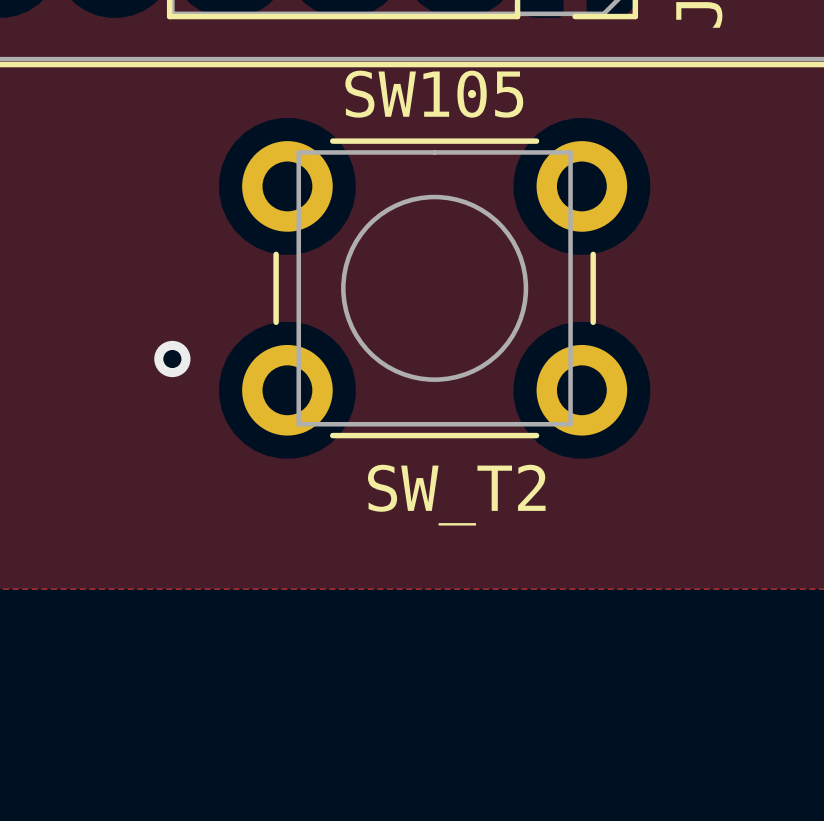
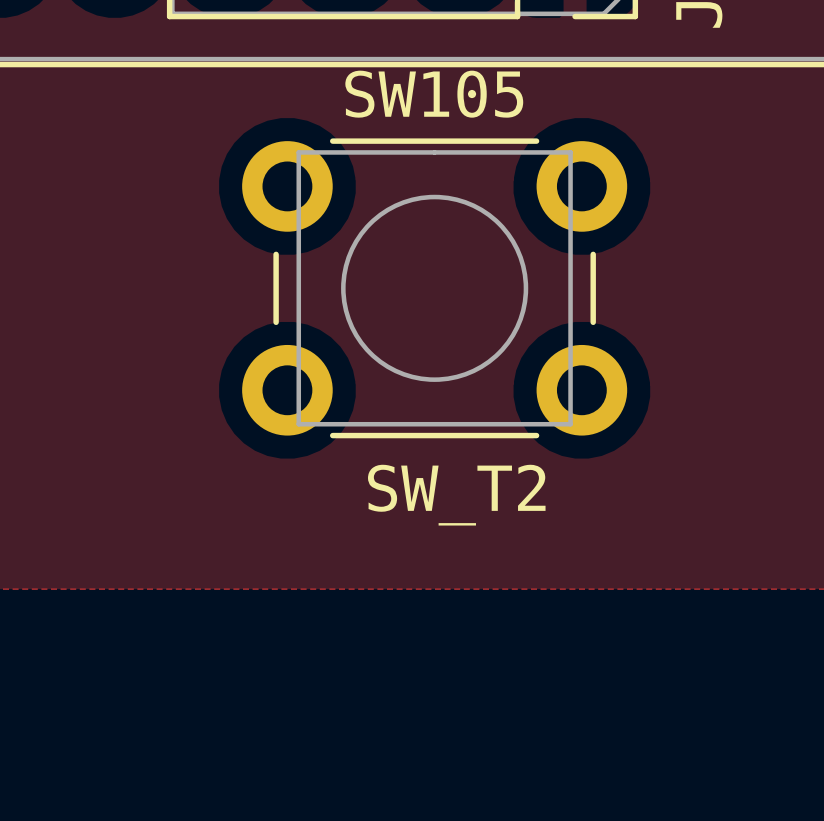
via: (172, 359) -> none

